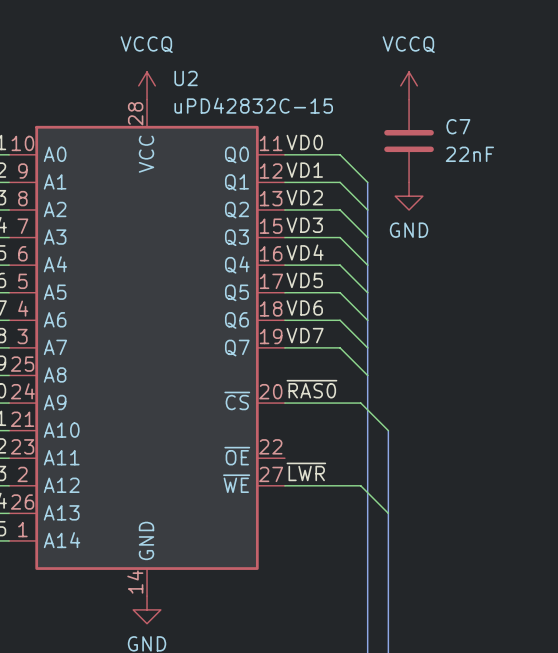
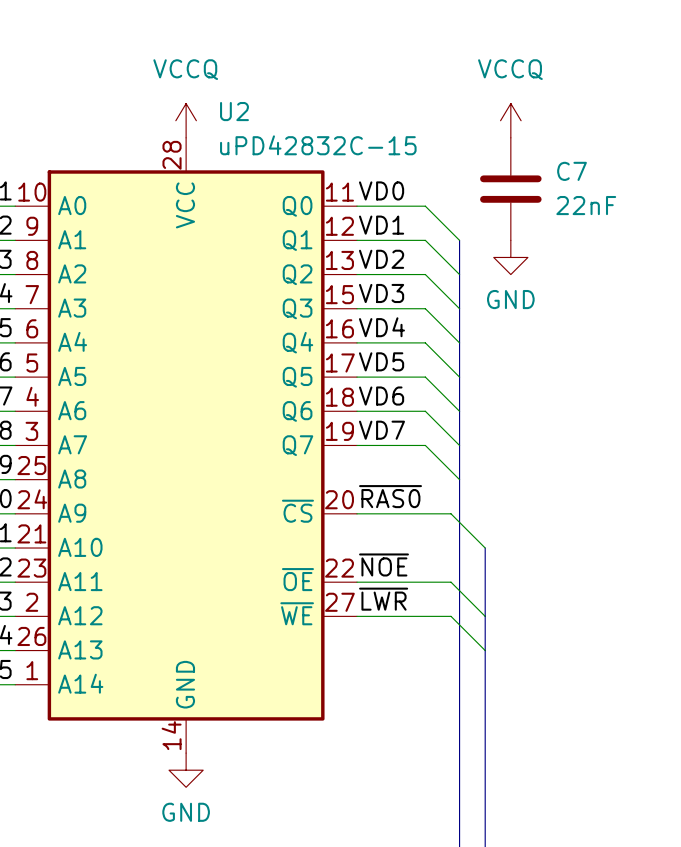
label: none -> ~{NOE} (384, 564)
wire: none -> (357, 582) (451, 582) (485, 616)

